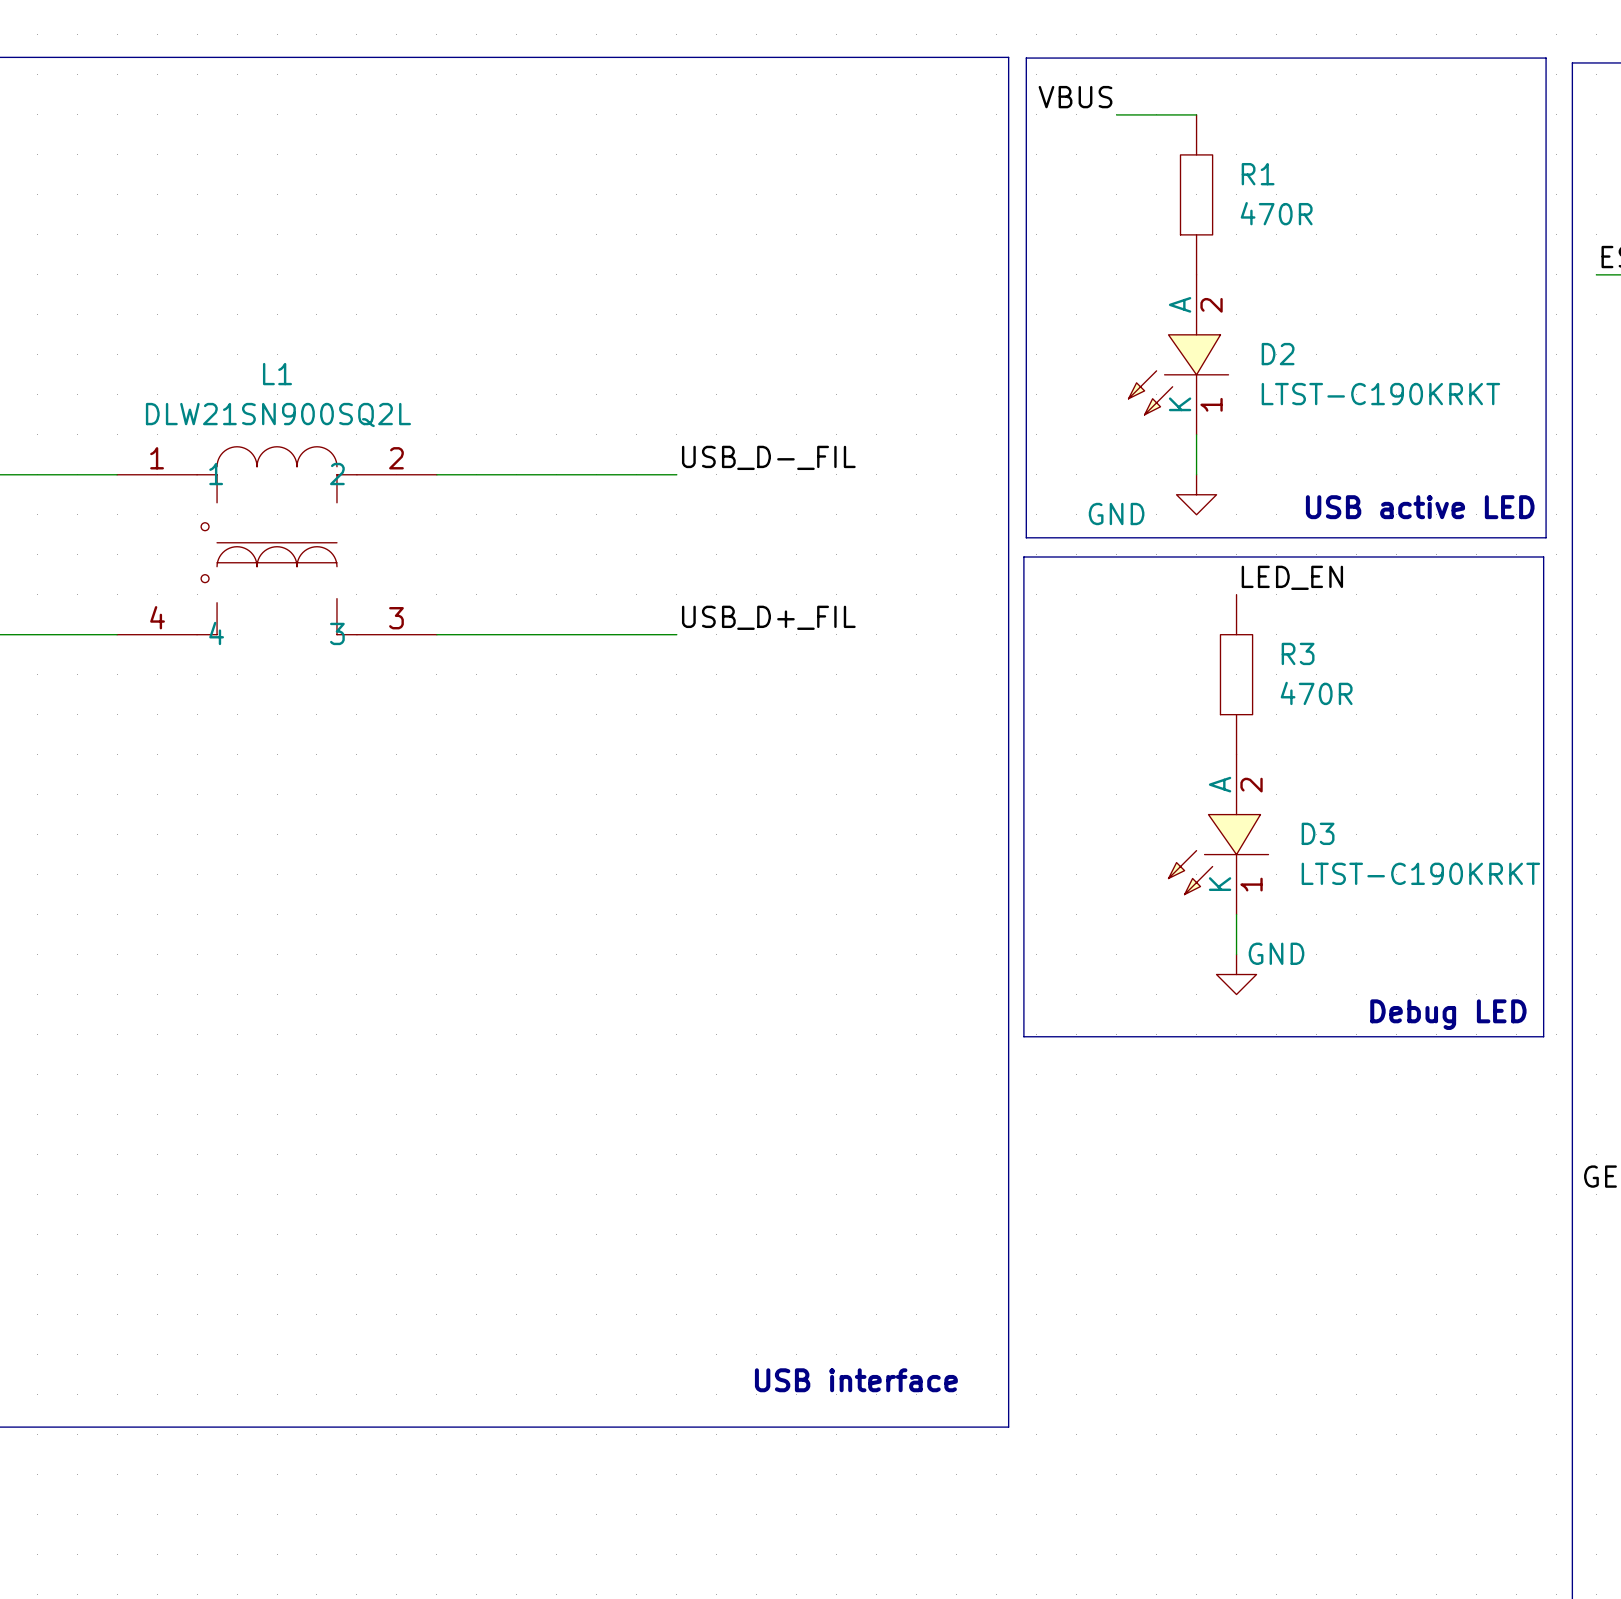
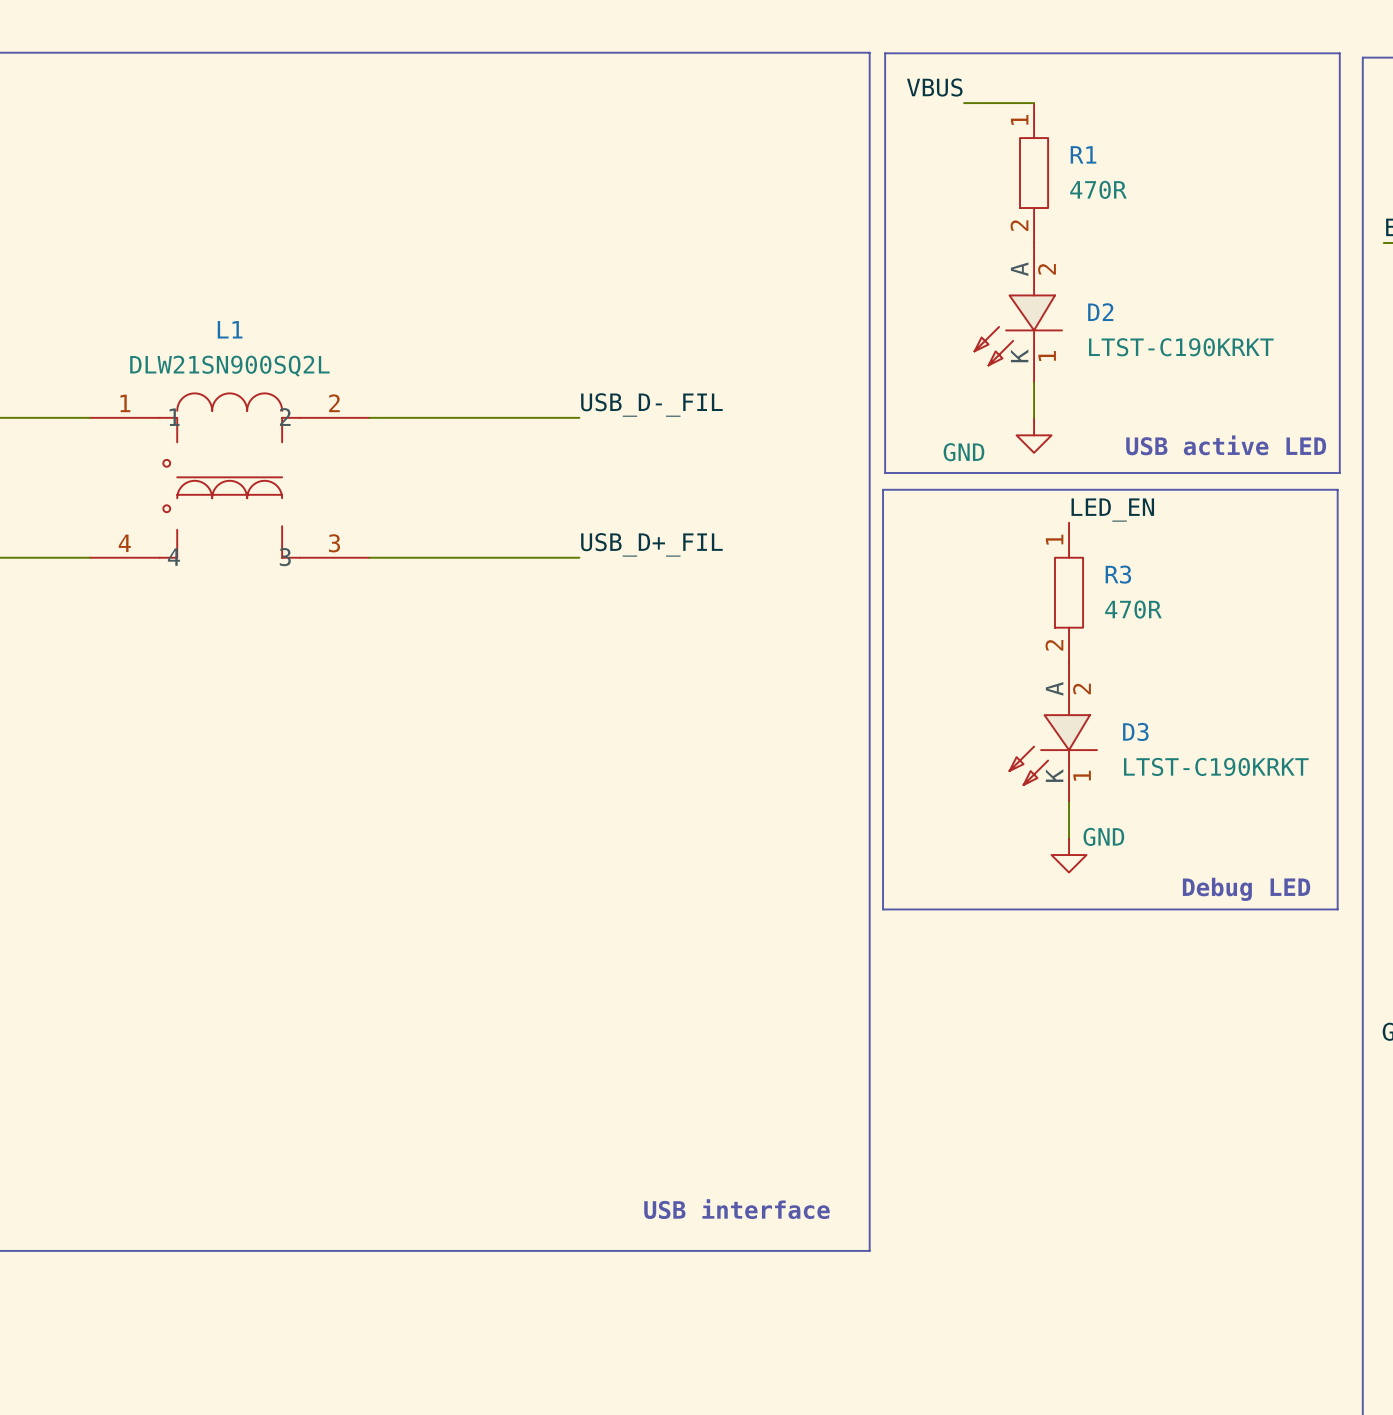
R1 pin number: none -> 1 (1019, 119)
R1 pin number: none -> 2 (1019, 225)
R3 pin number: none -> 1 (1054, 539)
R3 pin number: none -> 2 (1054, 645)

